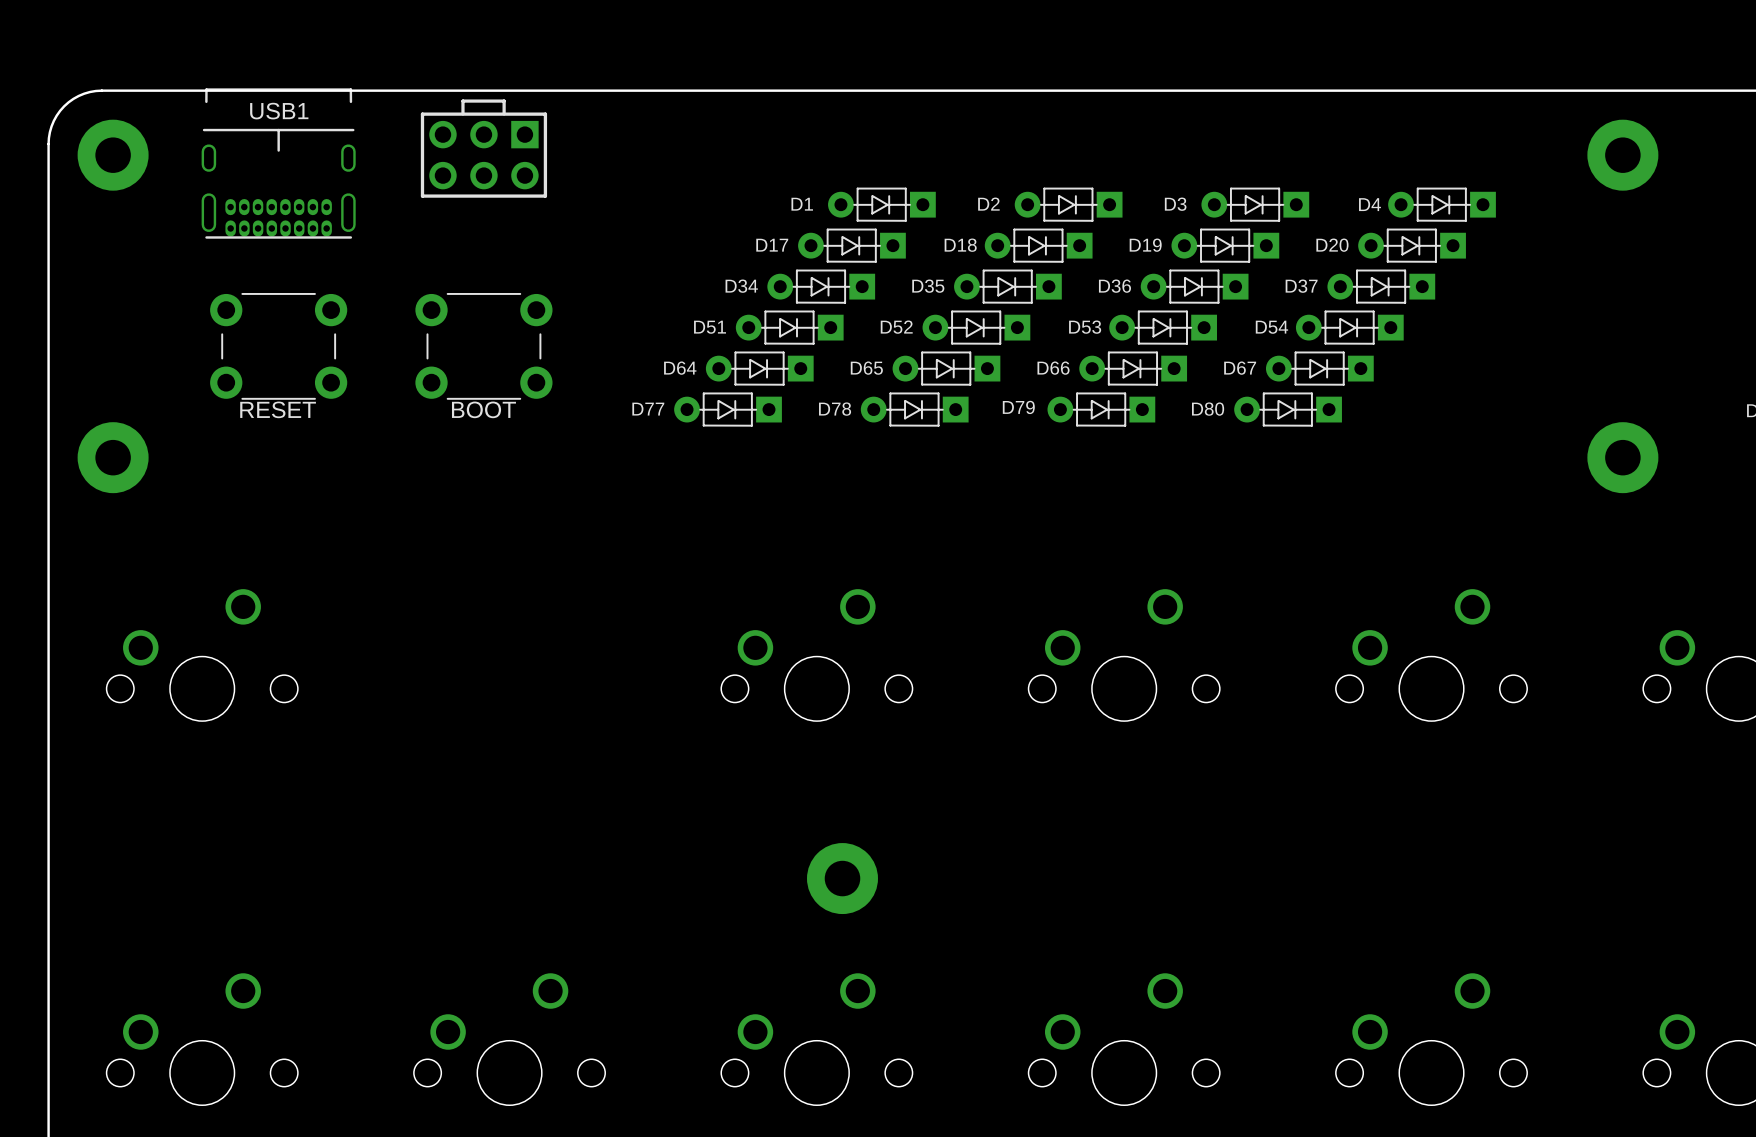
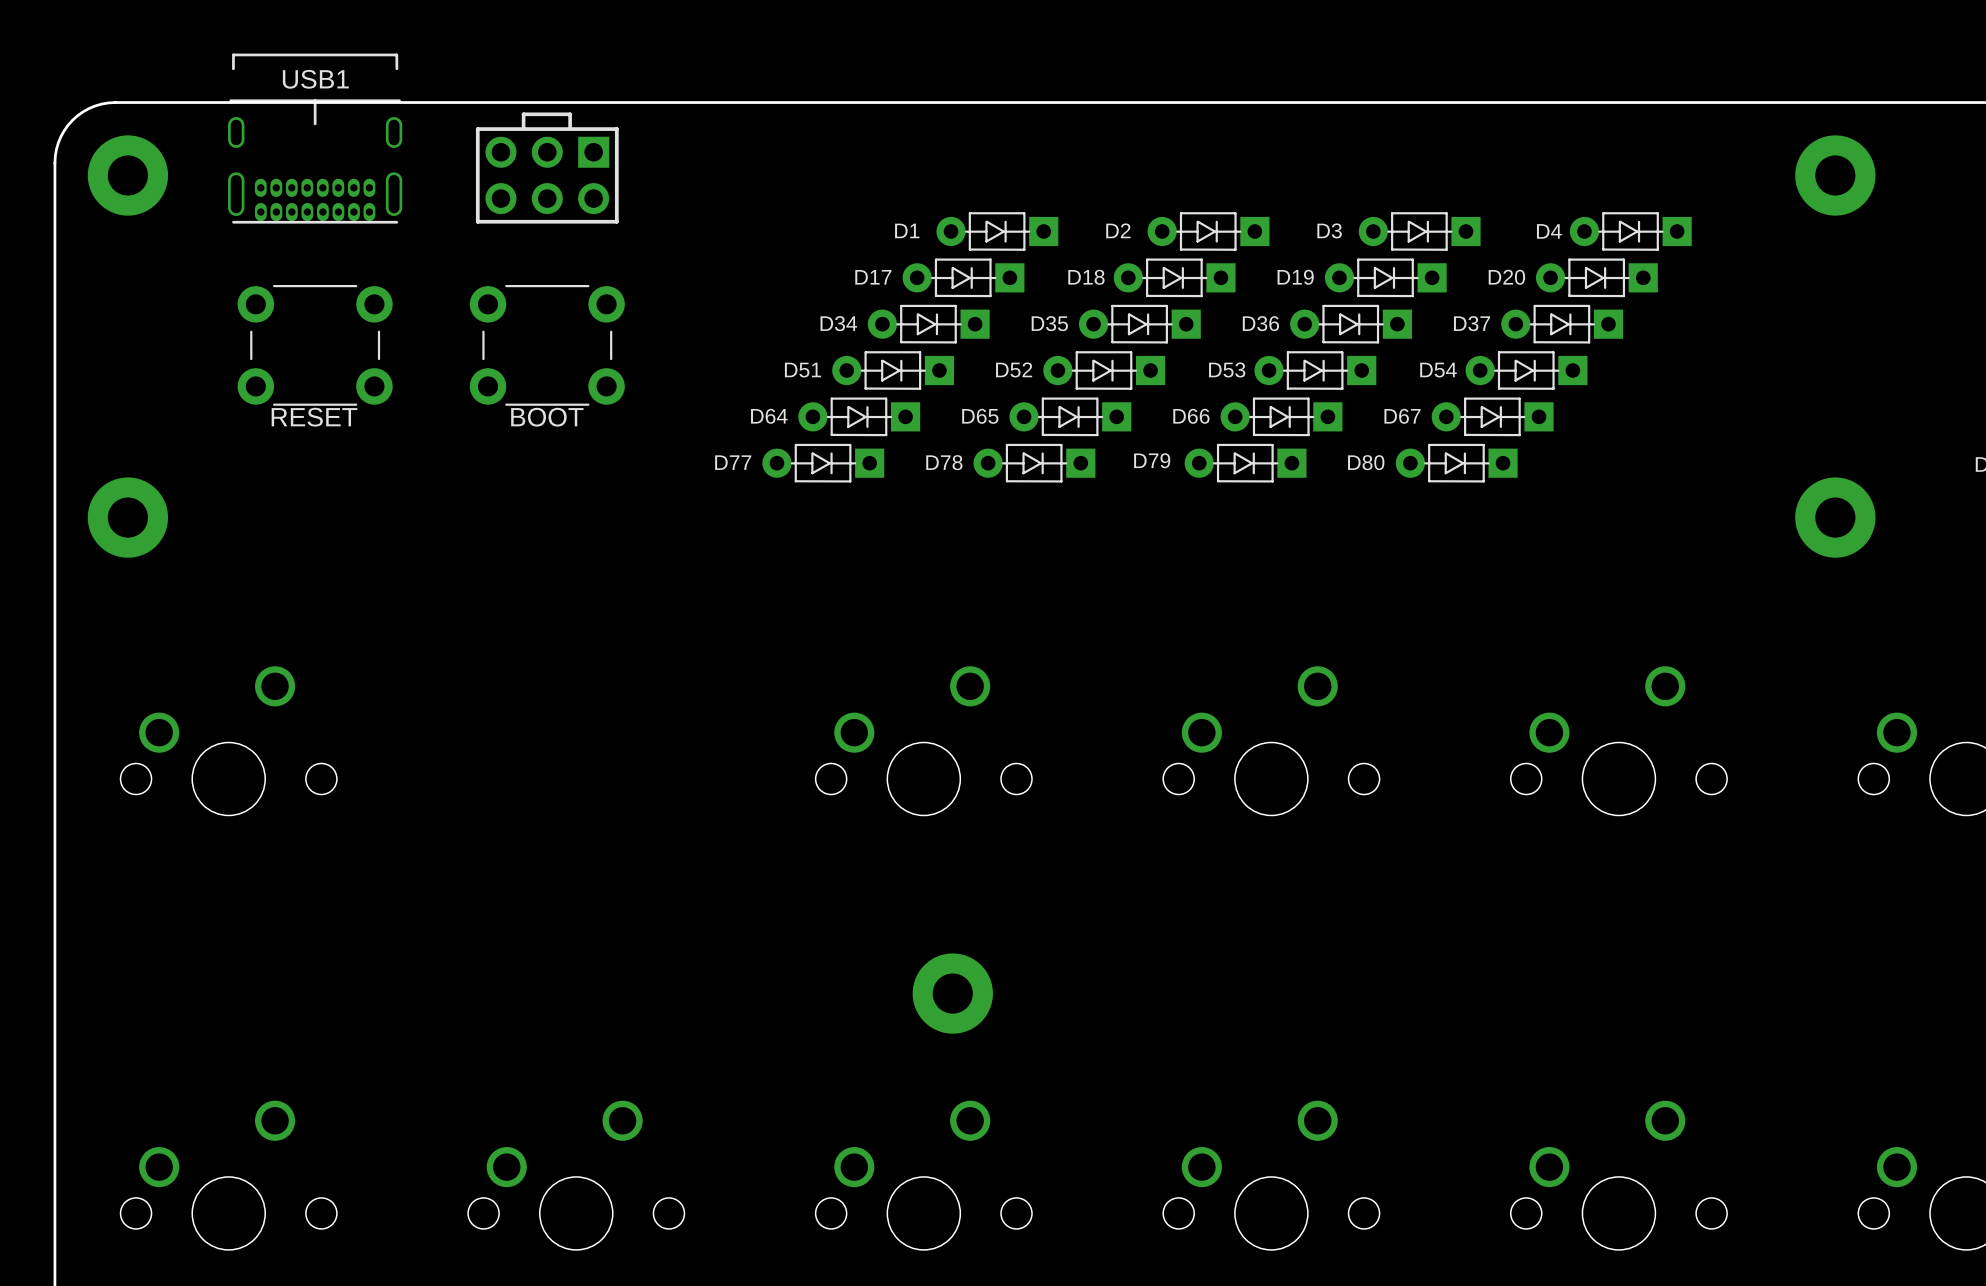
USB1 position: (278, 163) -> (315, 138)
part position: (278, 346) -> (315, 345)
part position: (483, 346) -> (547, 345)

